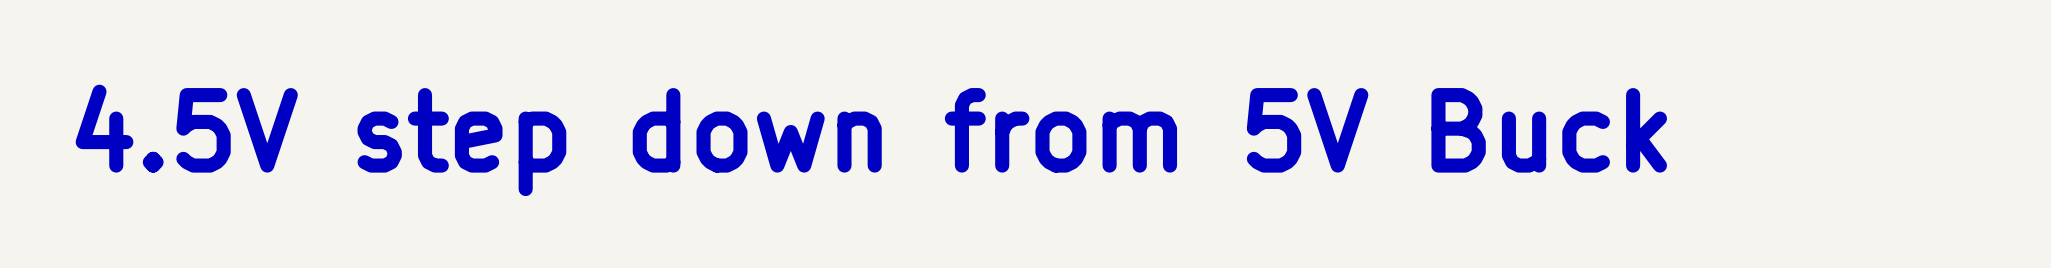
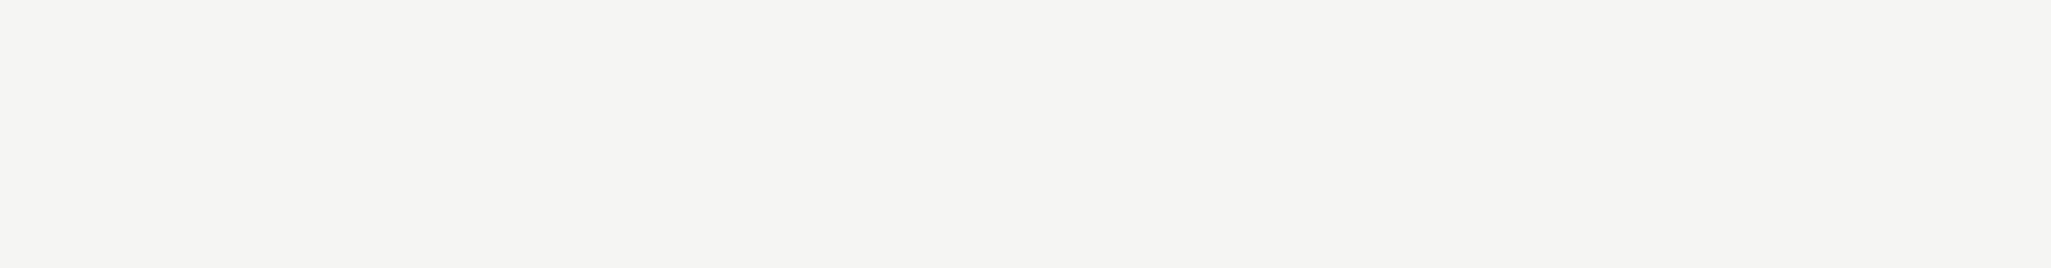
text: 4.5V step down from 5V Buck (871, 140) -> none

